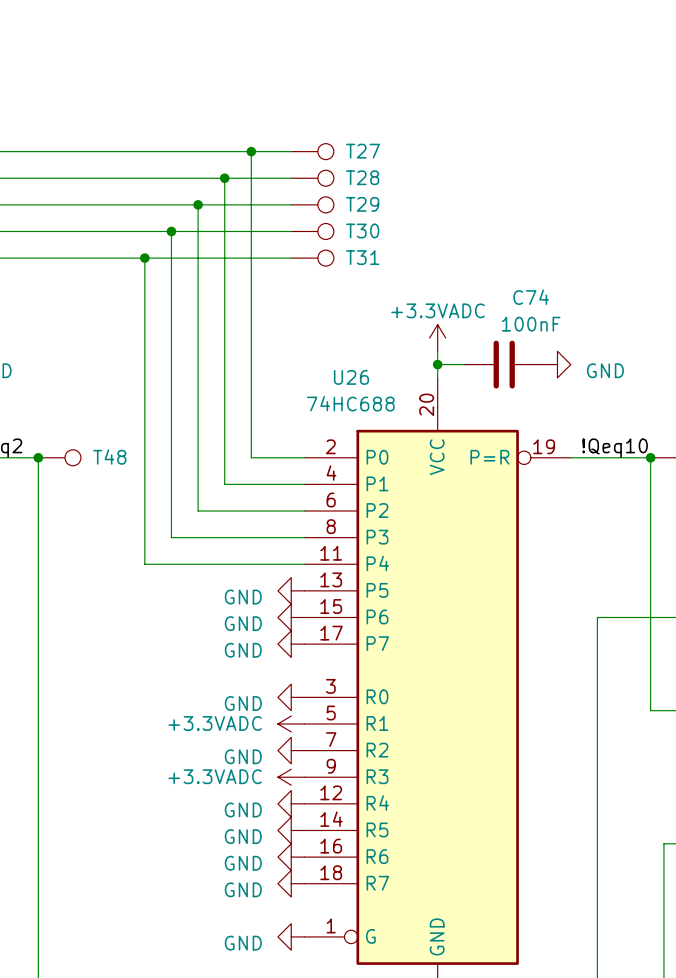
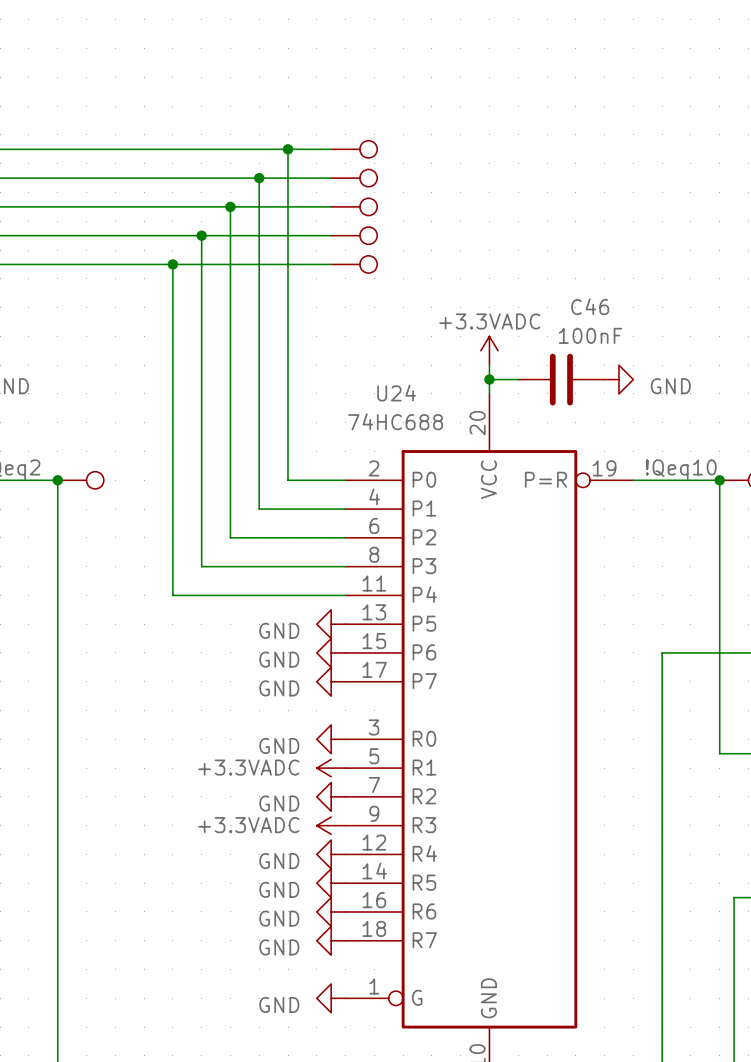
T27 name: T27 (362, 151) -> none
T28 name: T28 (362, 177) -> none
T29 name: T29 (362, 204) -> none
T30 name: T30 (362, 230) -> none
T31 name: T31 (362, 257) -> none
C74 name: C74 (531, 297) -> C46 (590, 306)
U26 name: U26 (351, 377) -> U24 (396, 393)
T48 name: T48 (109, 456) -> none

